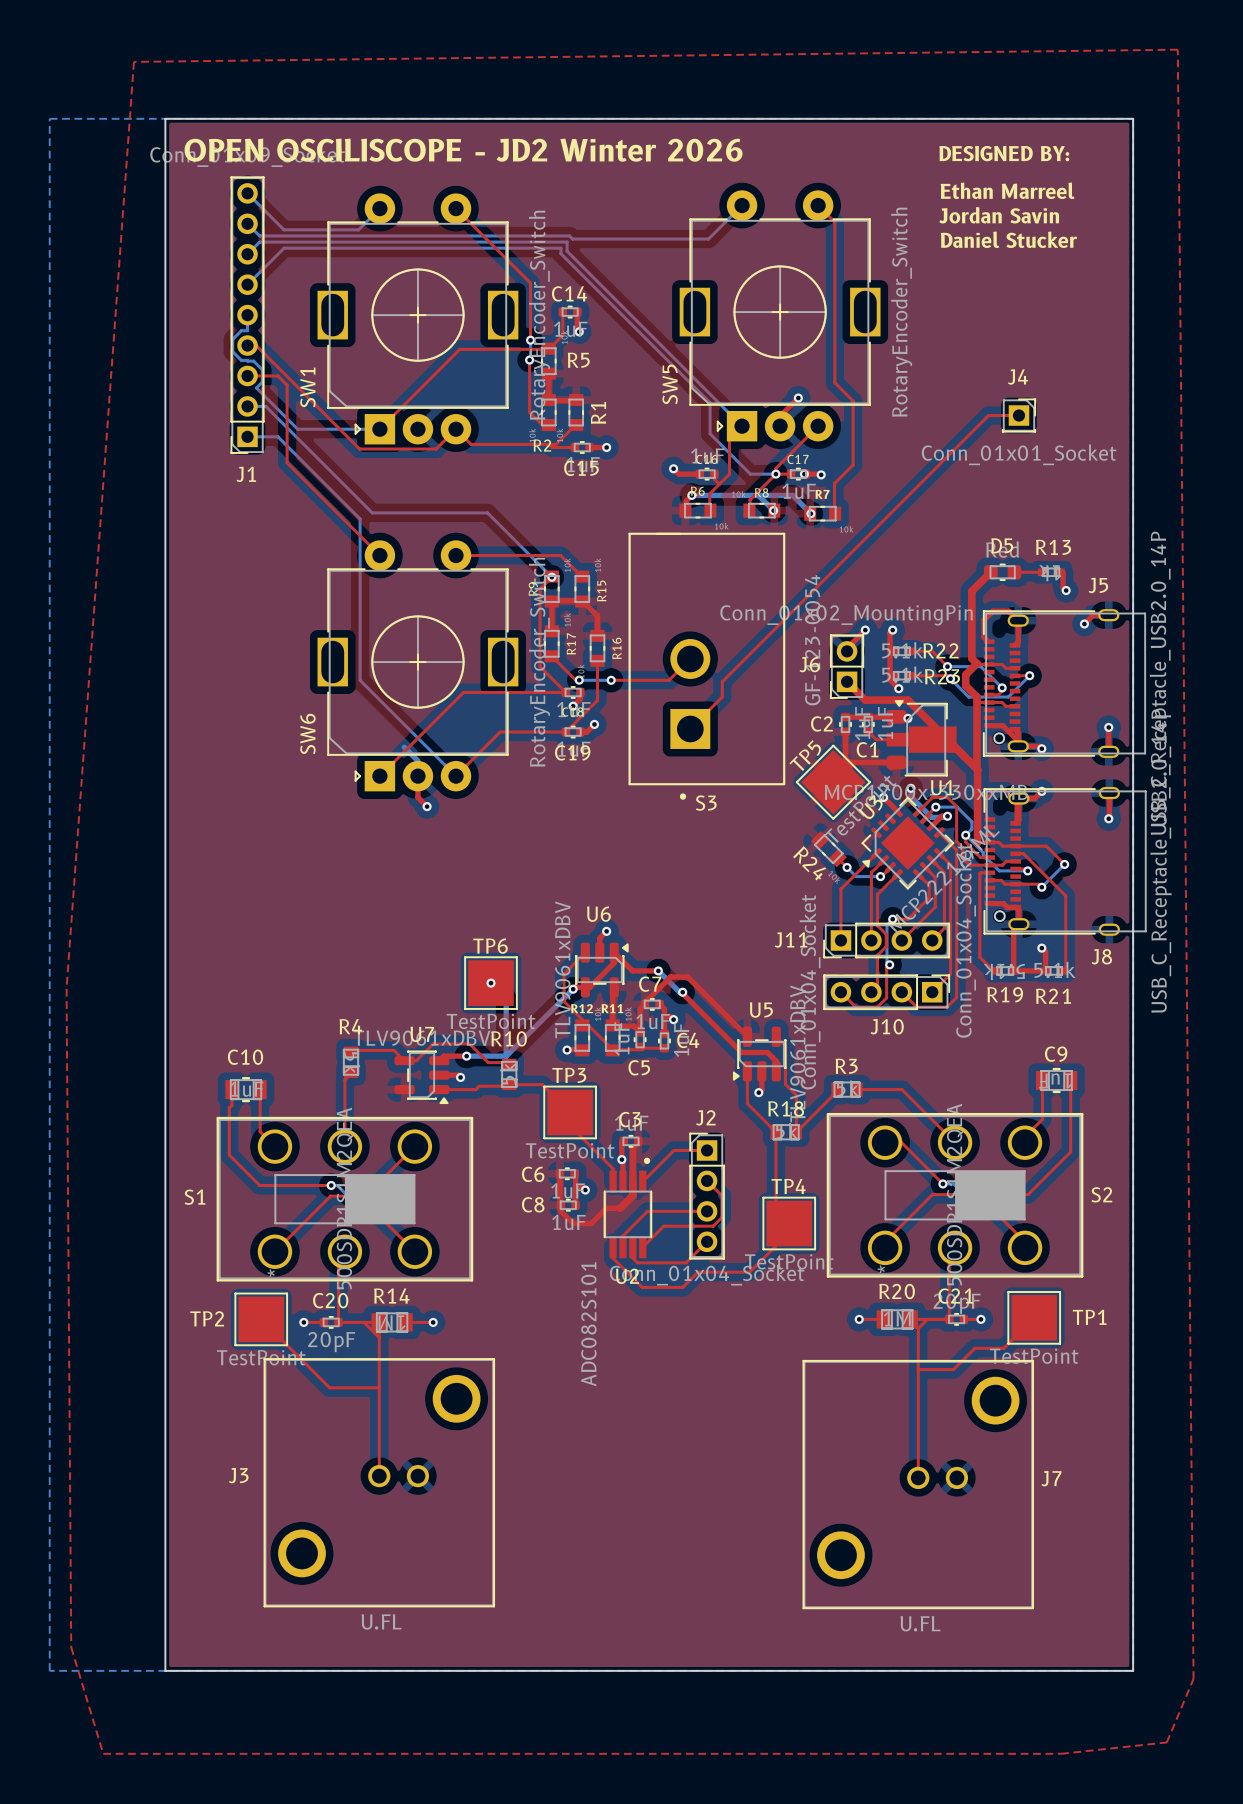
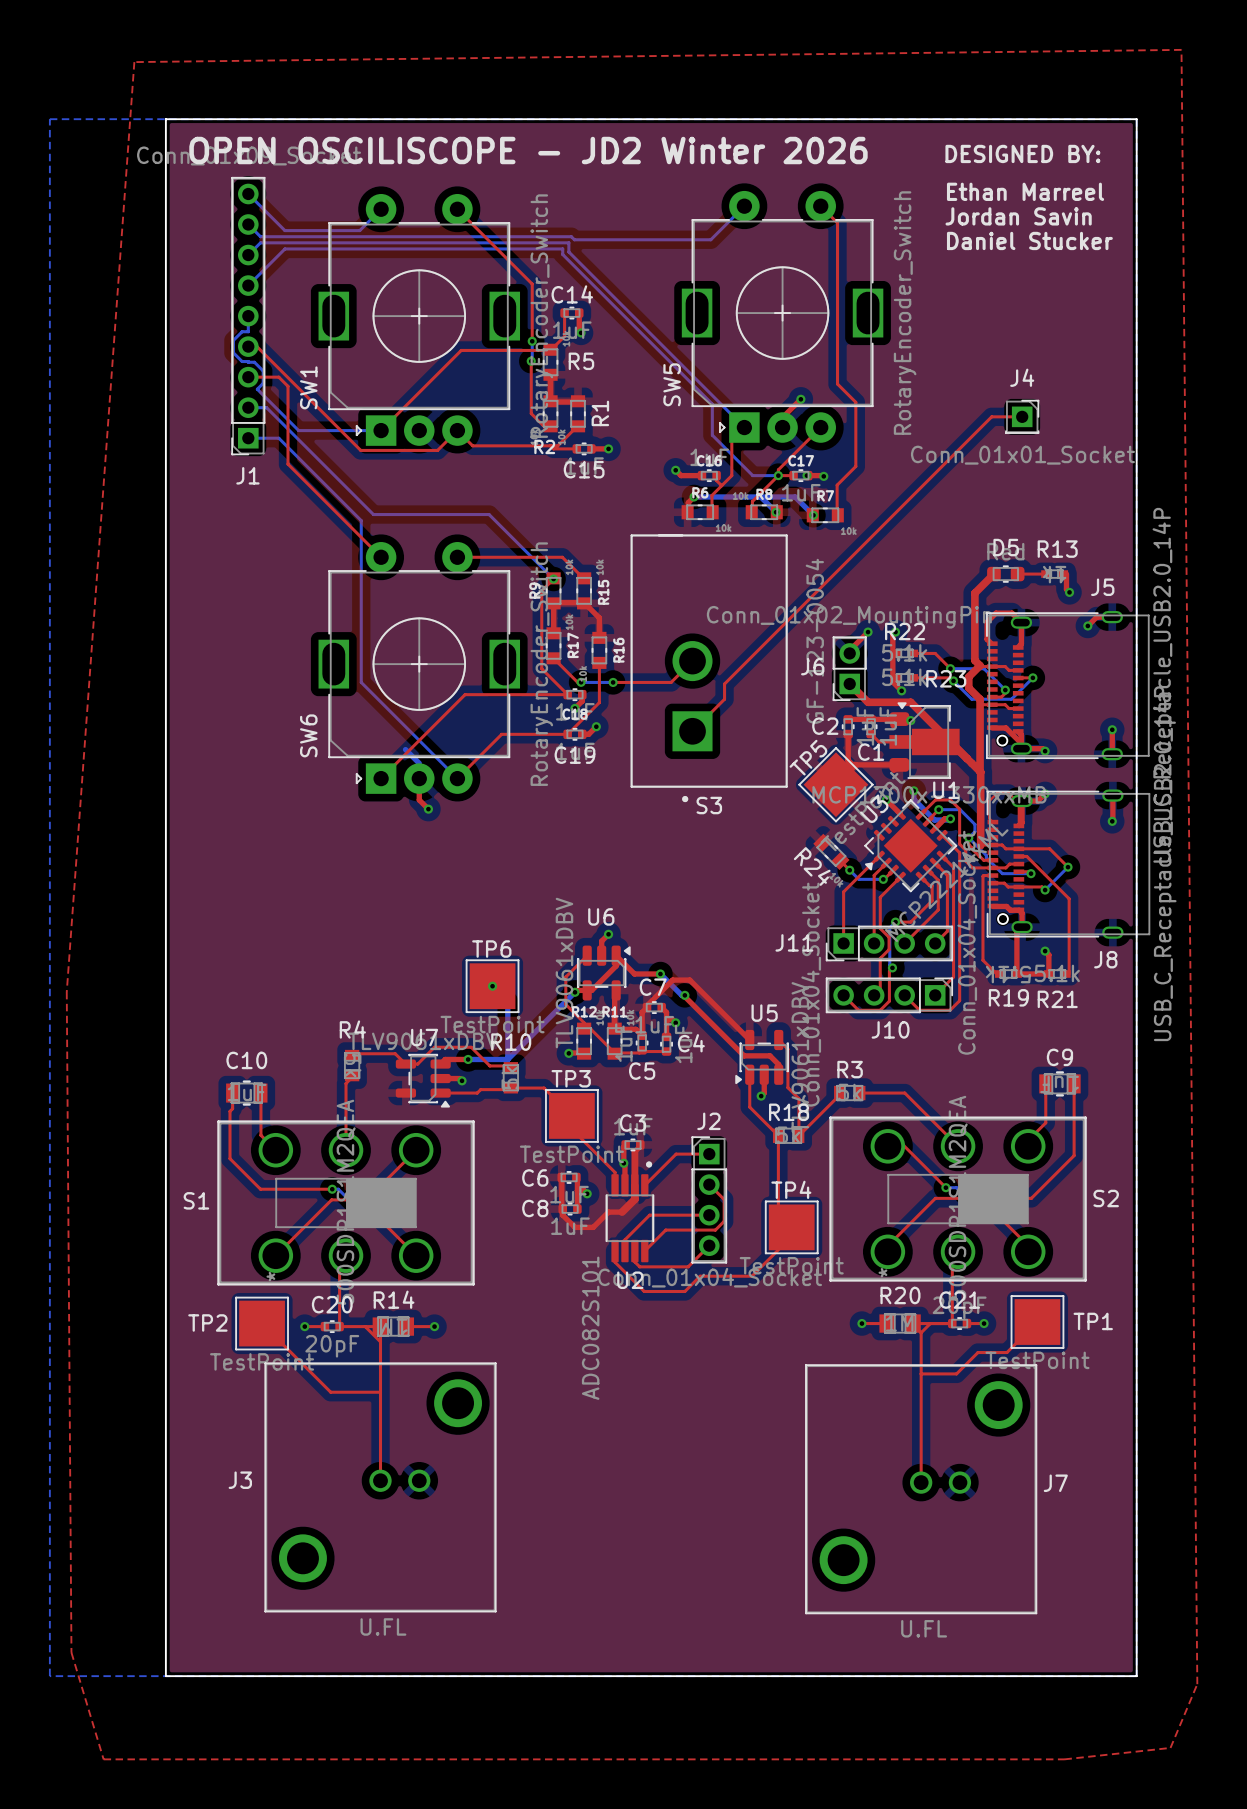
R22 name position: R22 (940, 650) -> R22 (905, 631)

